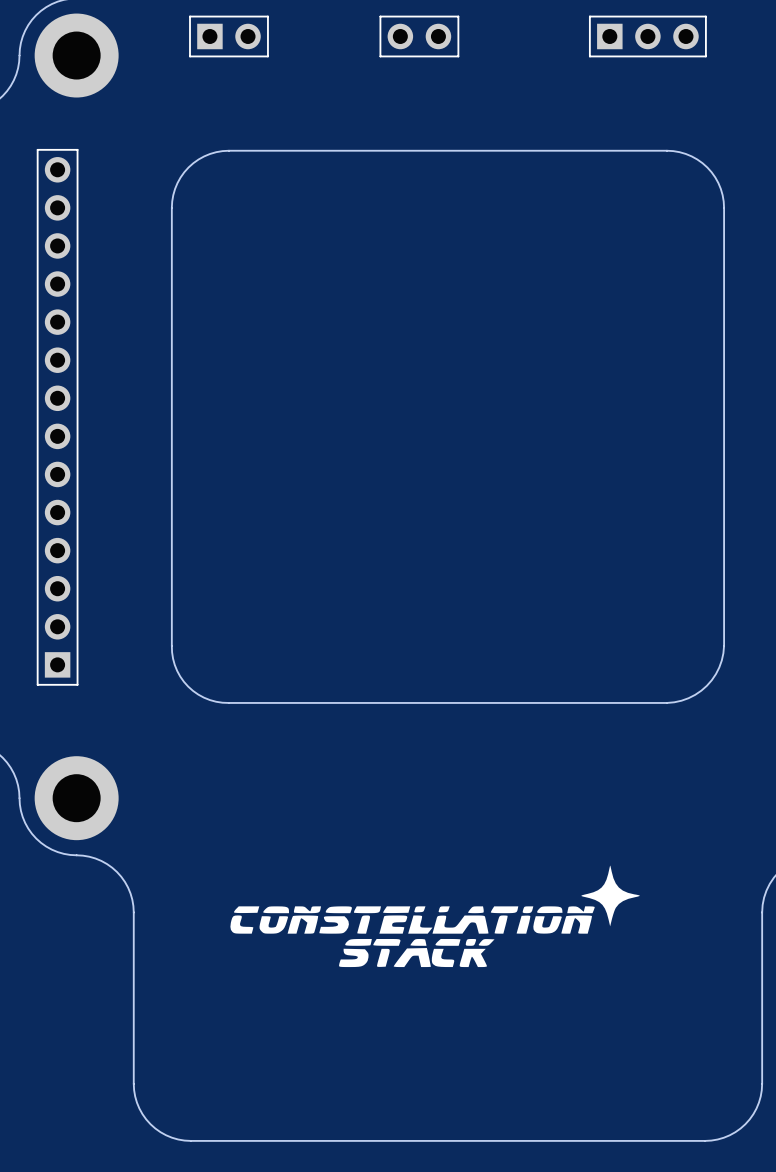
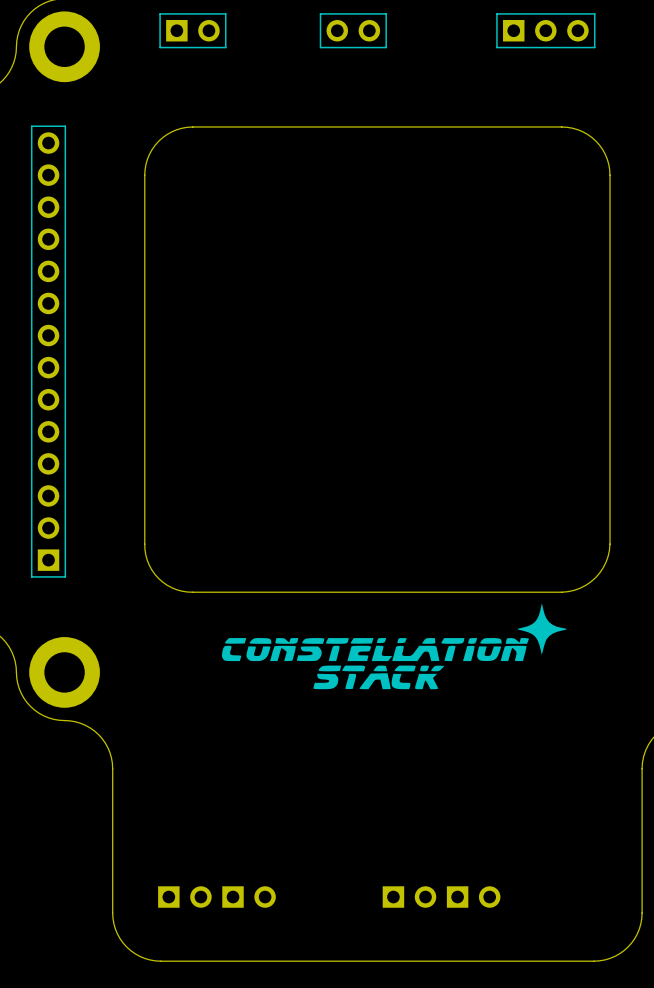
drawing position: (435, 916) -> (394, 646)
part: none -> (216, 897)
part: none -> (441, 897)

